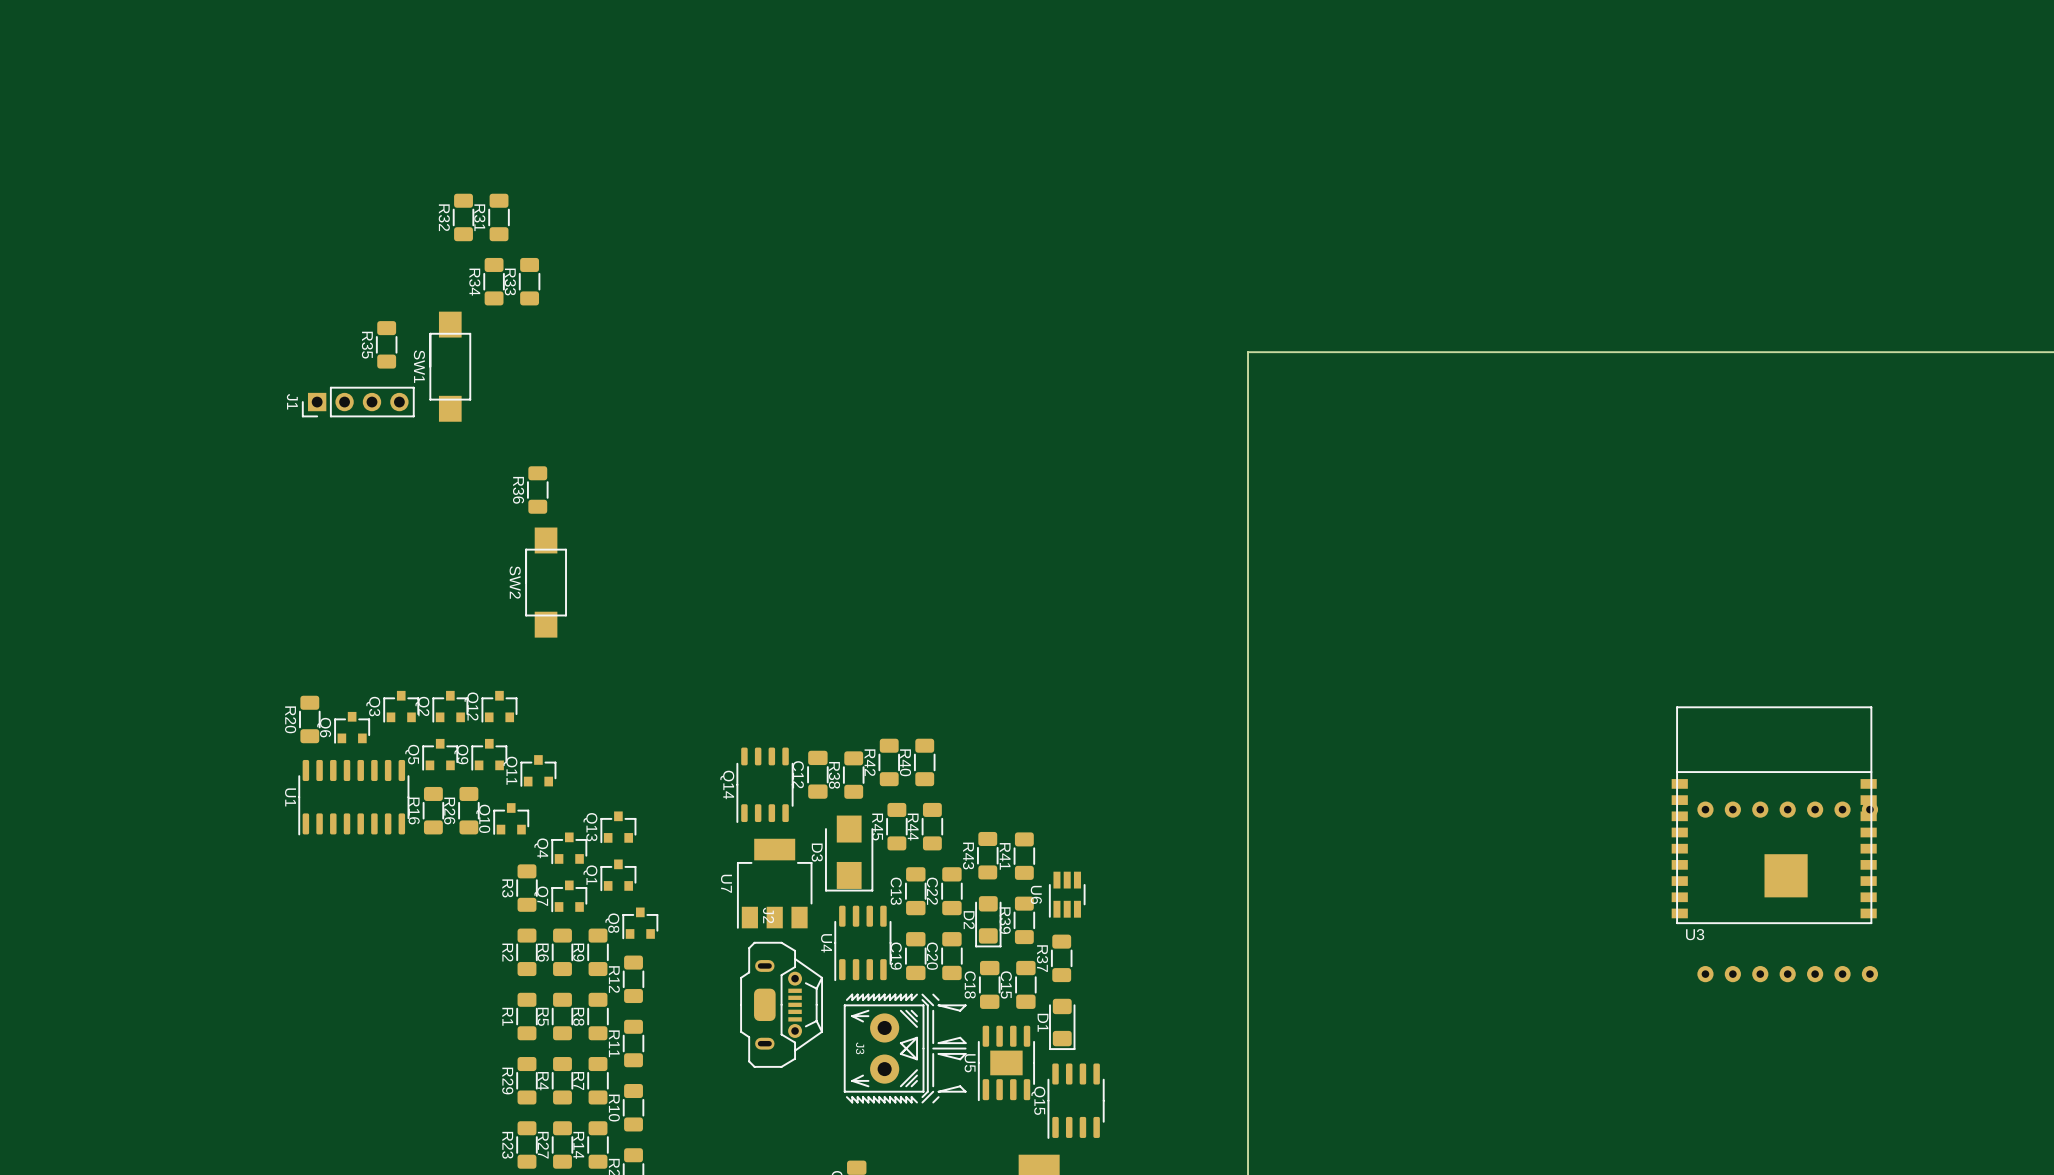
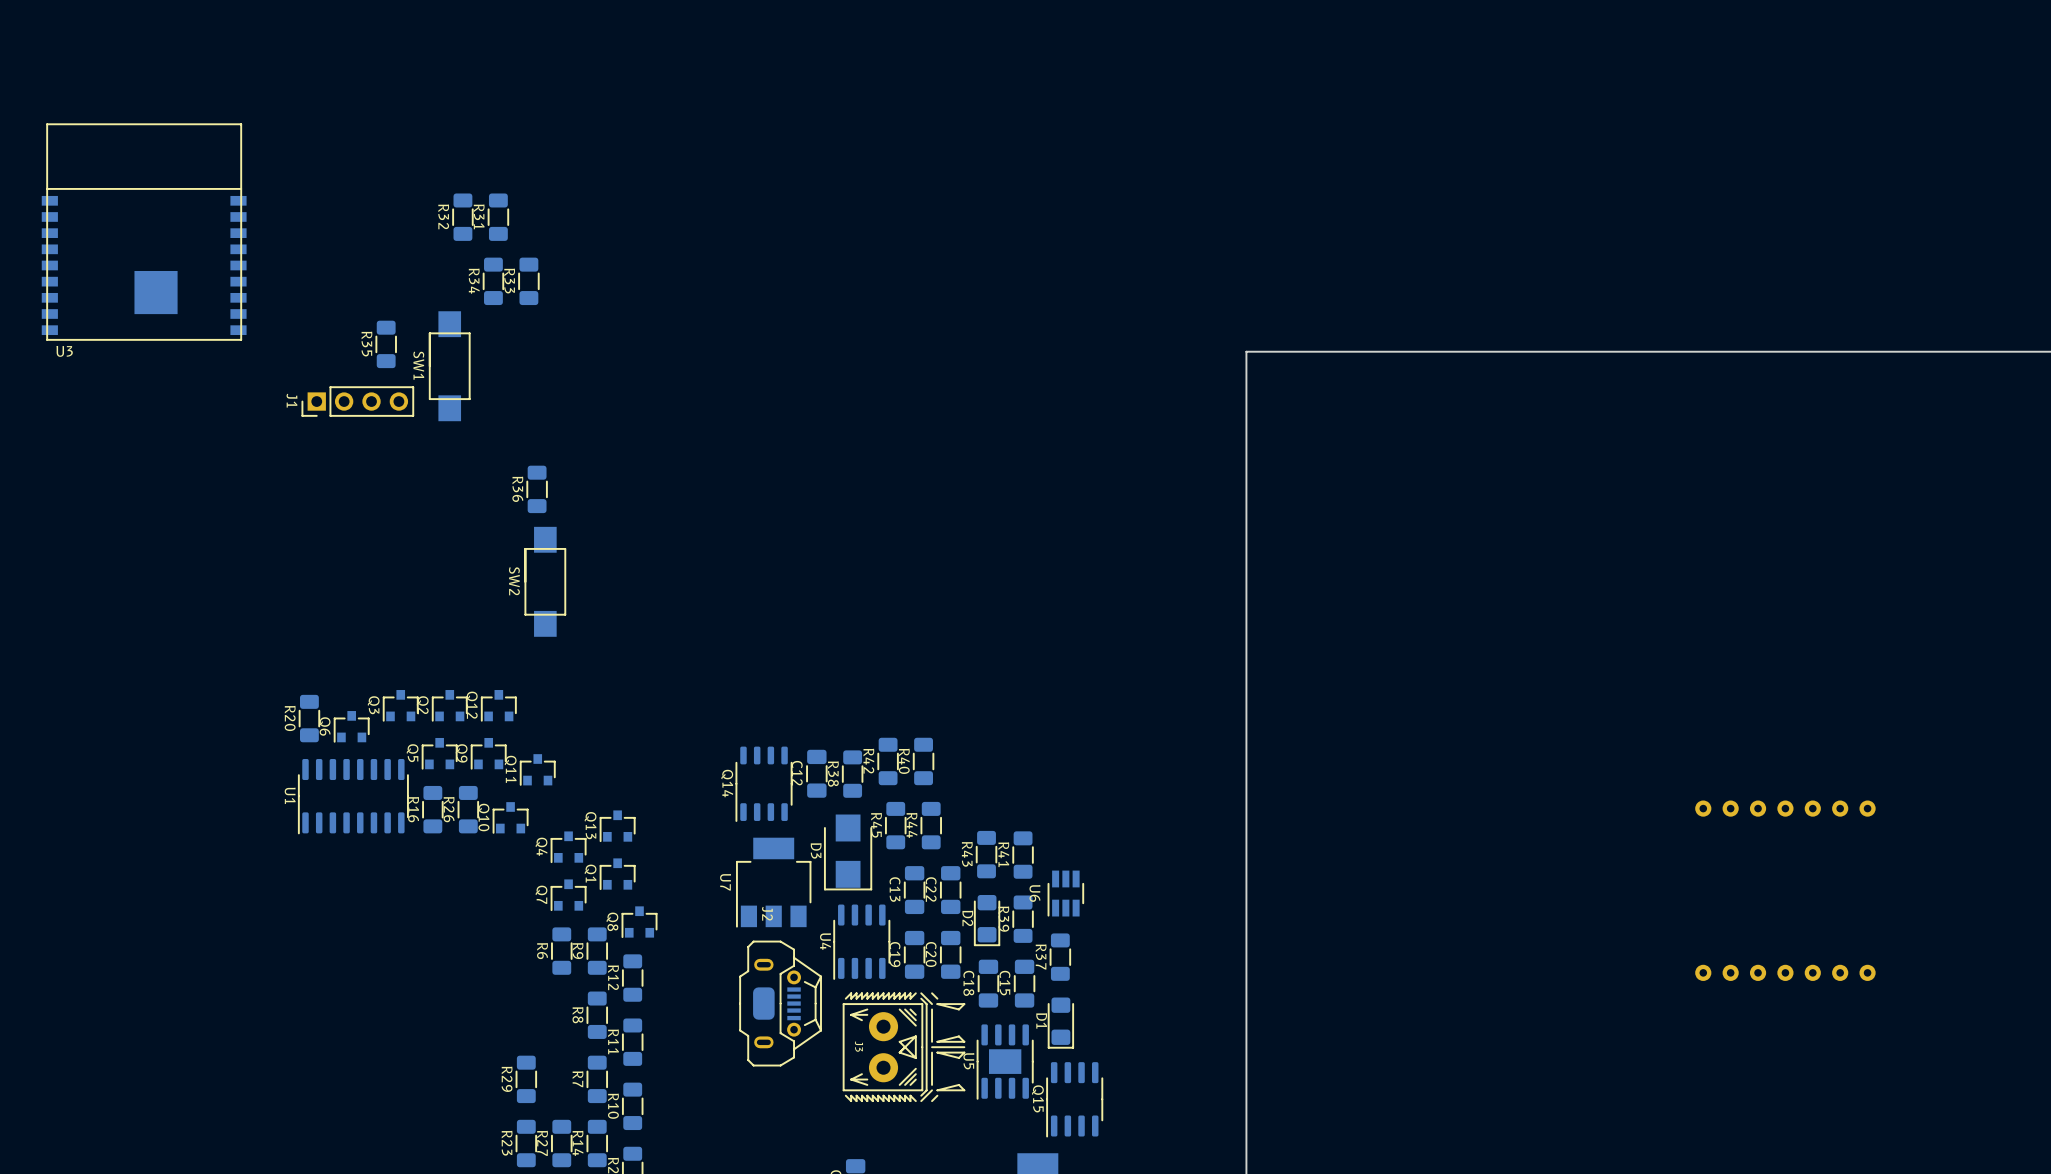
U3 position: (1774, 815) -> (144, 232)
R3: (526, 888) -> none
R2: (526, 952) -> none
R1: (526, 1016) -> none
R5: (562, 1016) -> none
R4: (562, 1080) -> none

